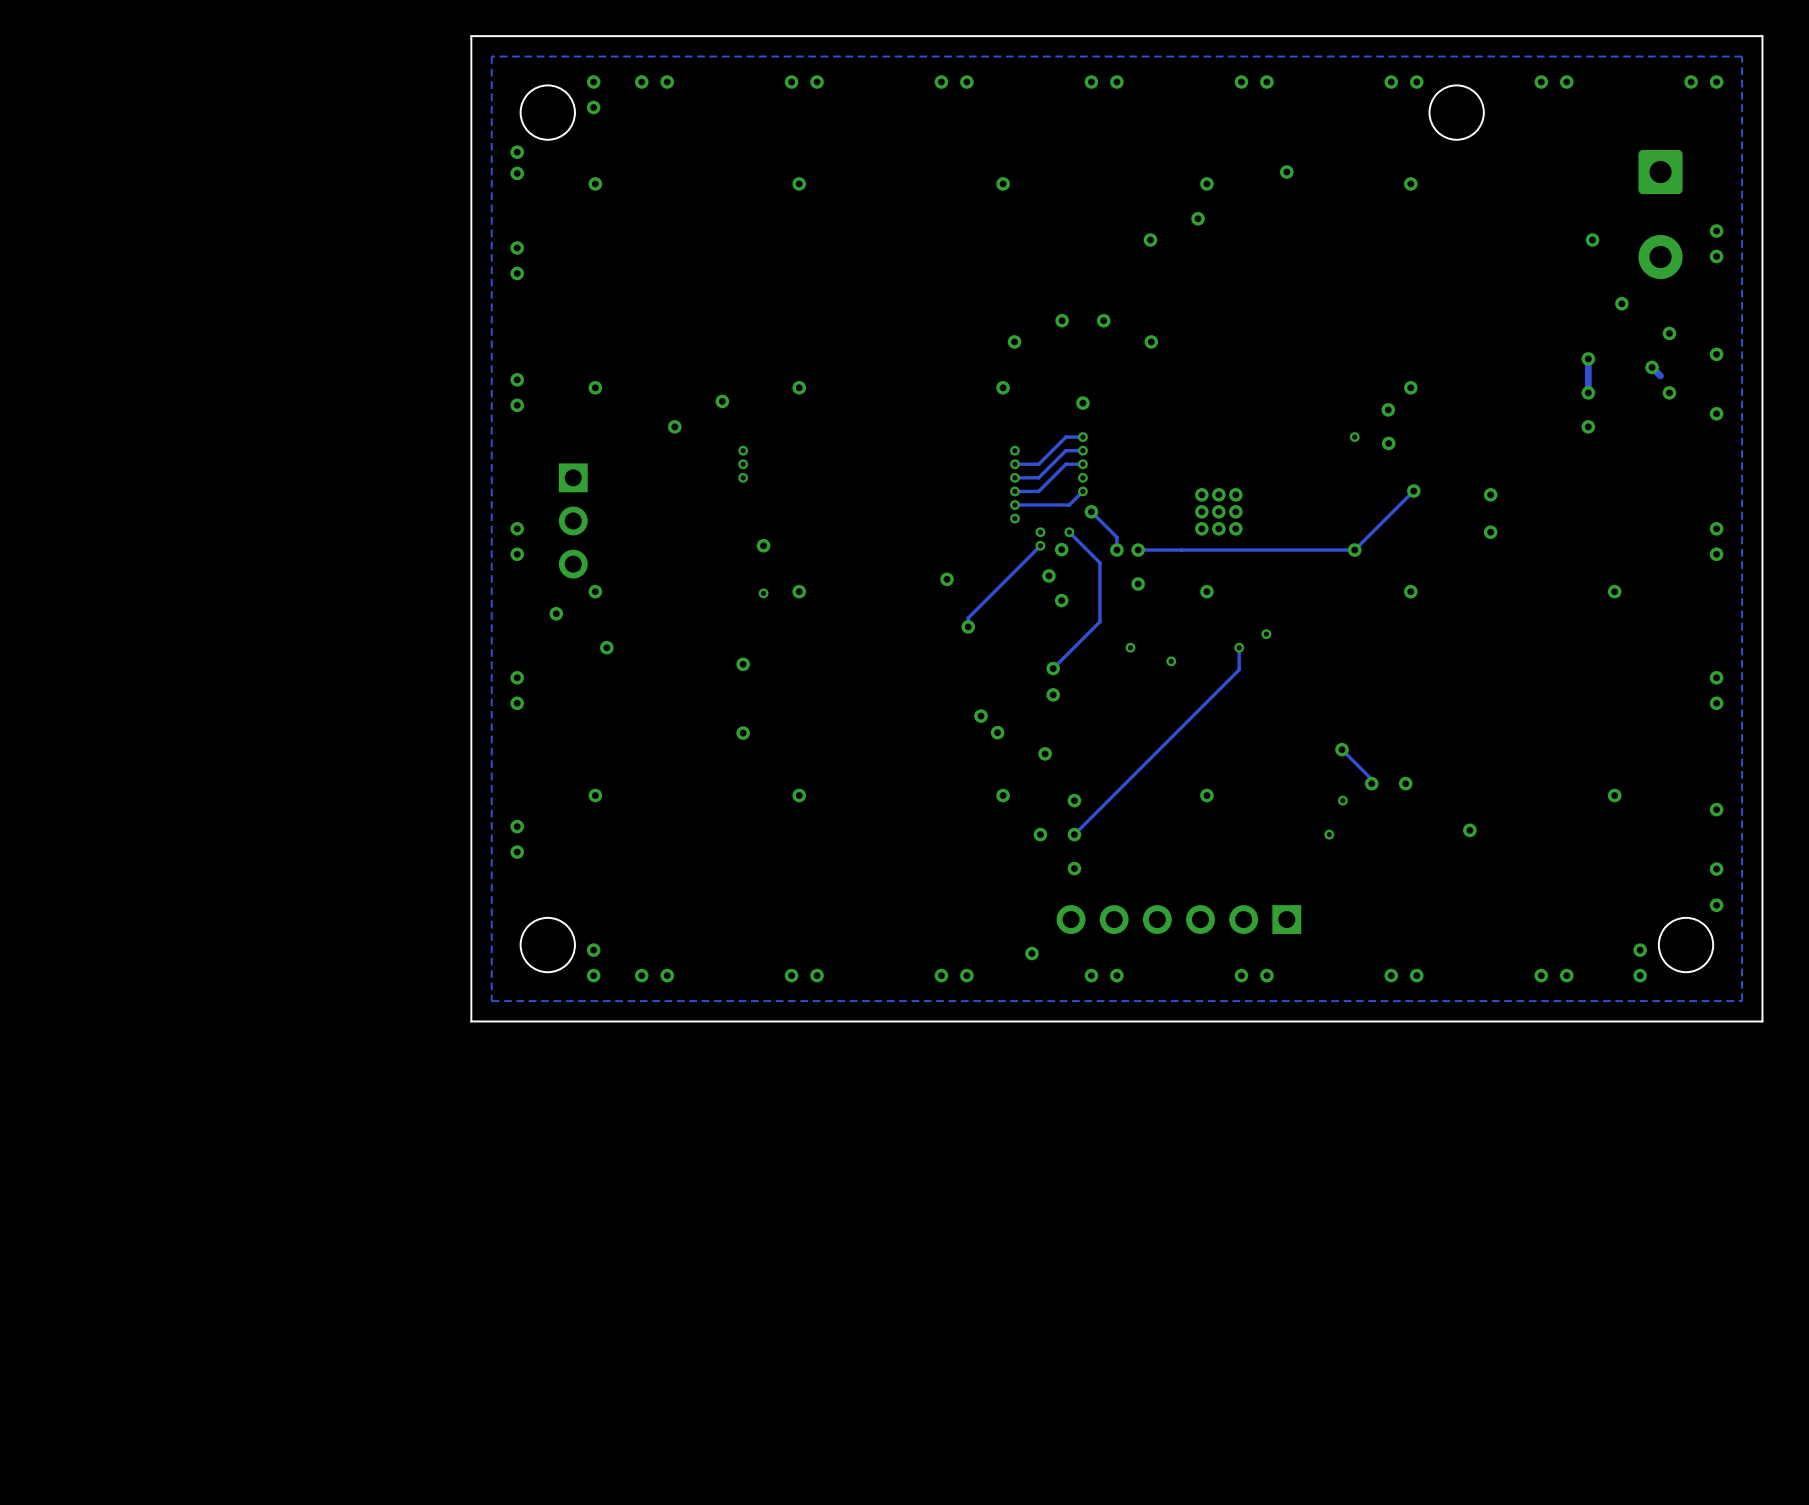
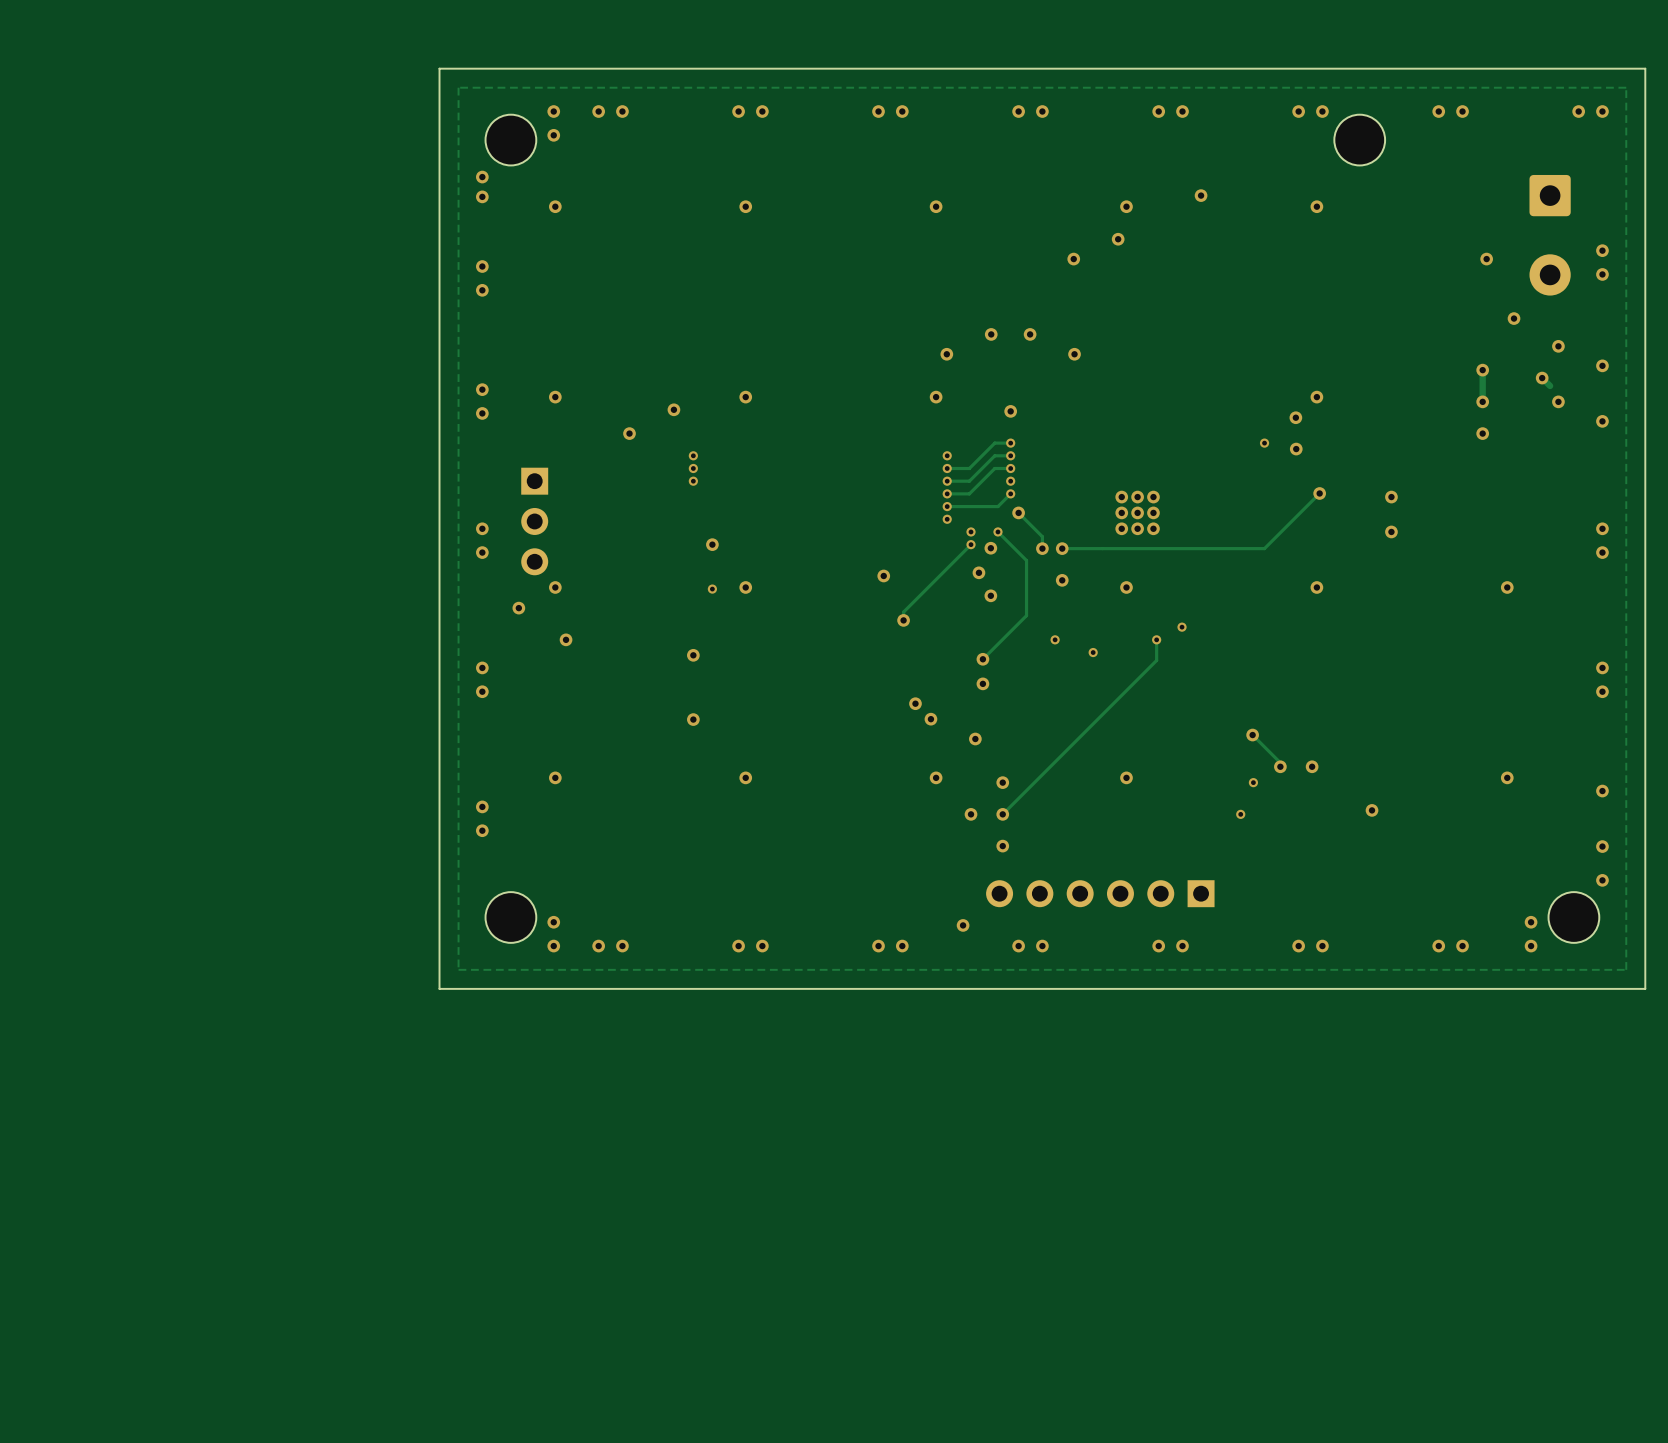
via: (1354, 550) -> none

